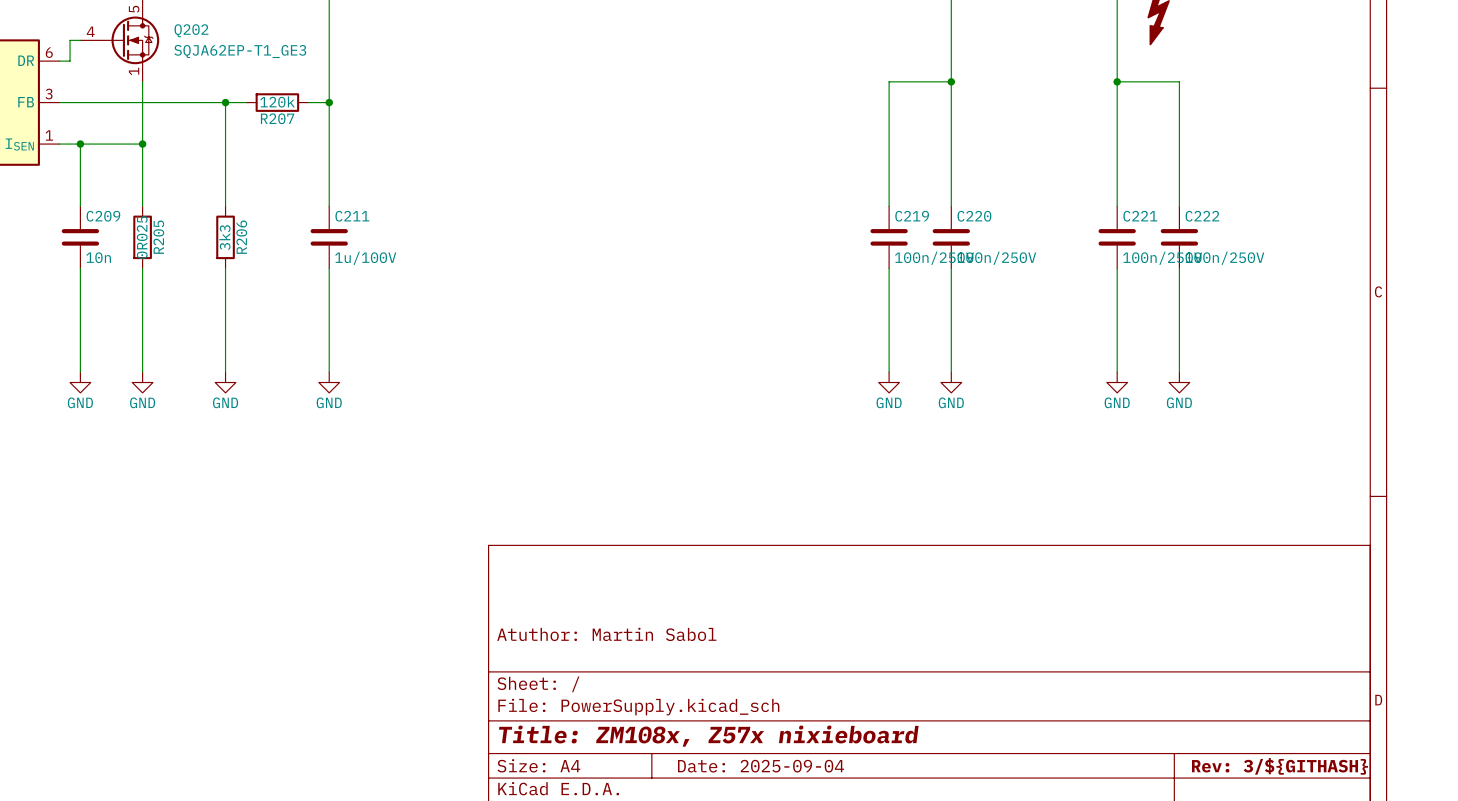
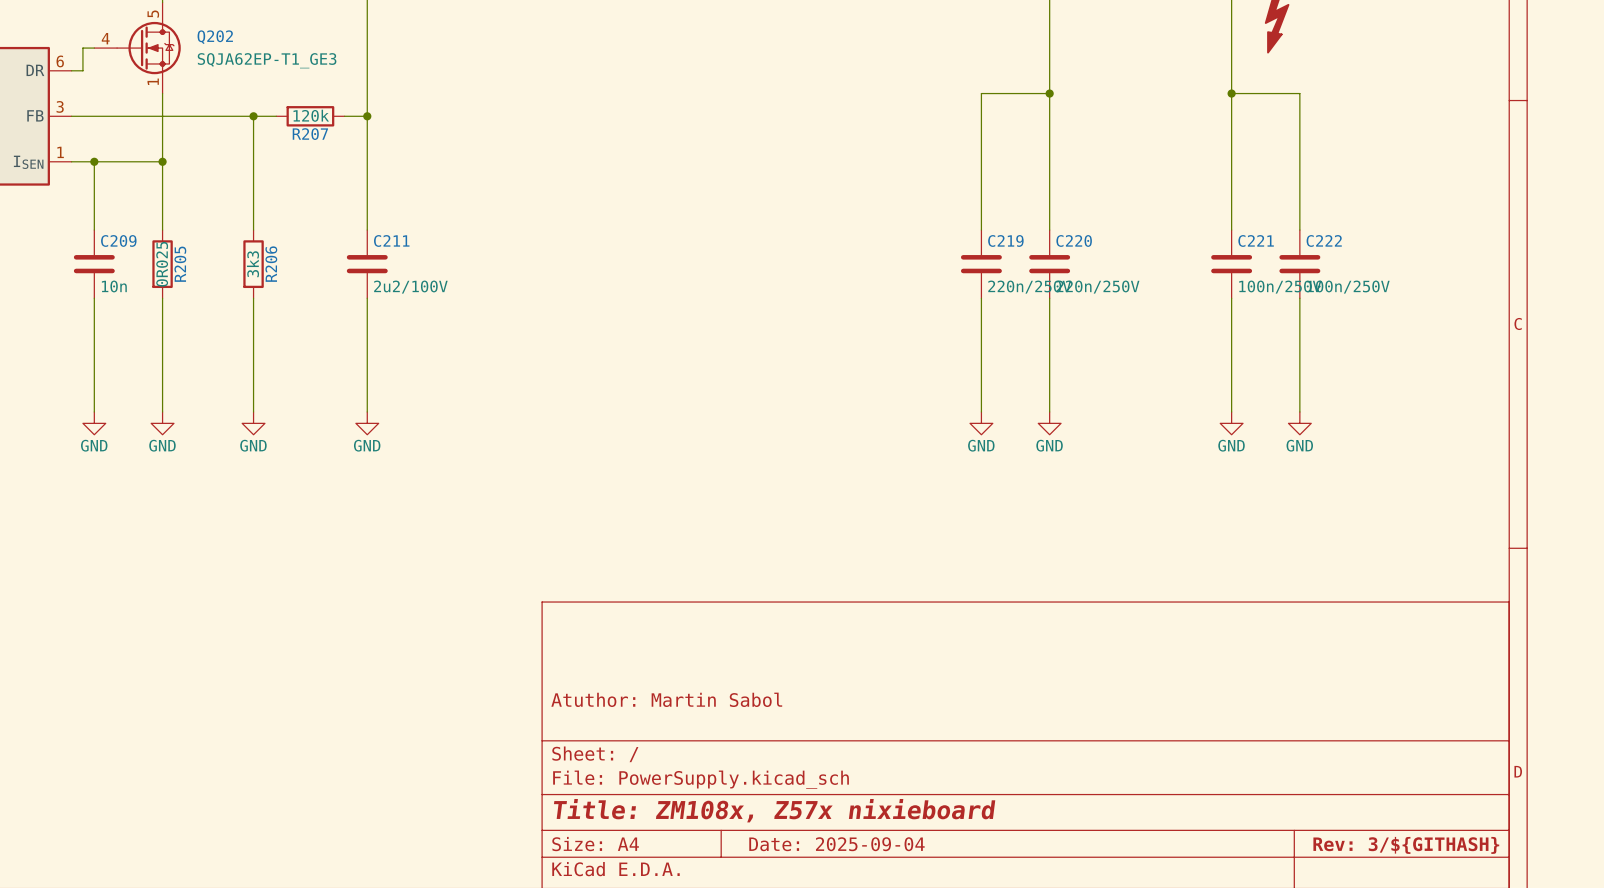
C211 value: 1u/100V (365, 258) -> 2u2/100V (410, 287)
C219 value: 100n/250V (934, 258) -> 220n/250V (1029, 287)
C220 value: 100n/250V (996, 258) -> 220n/250V (1097, 287)

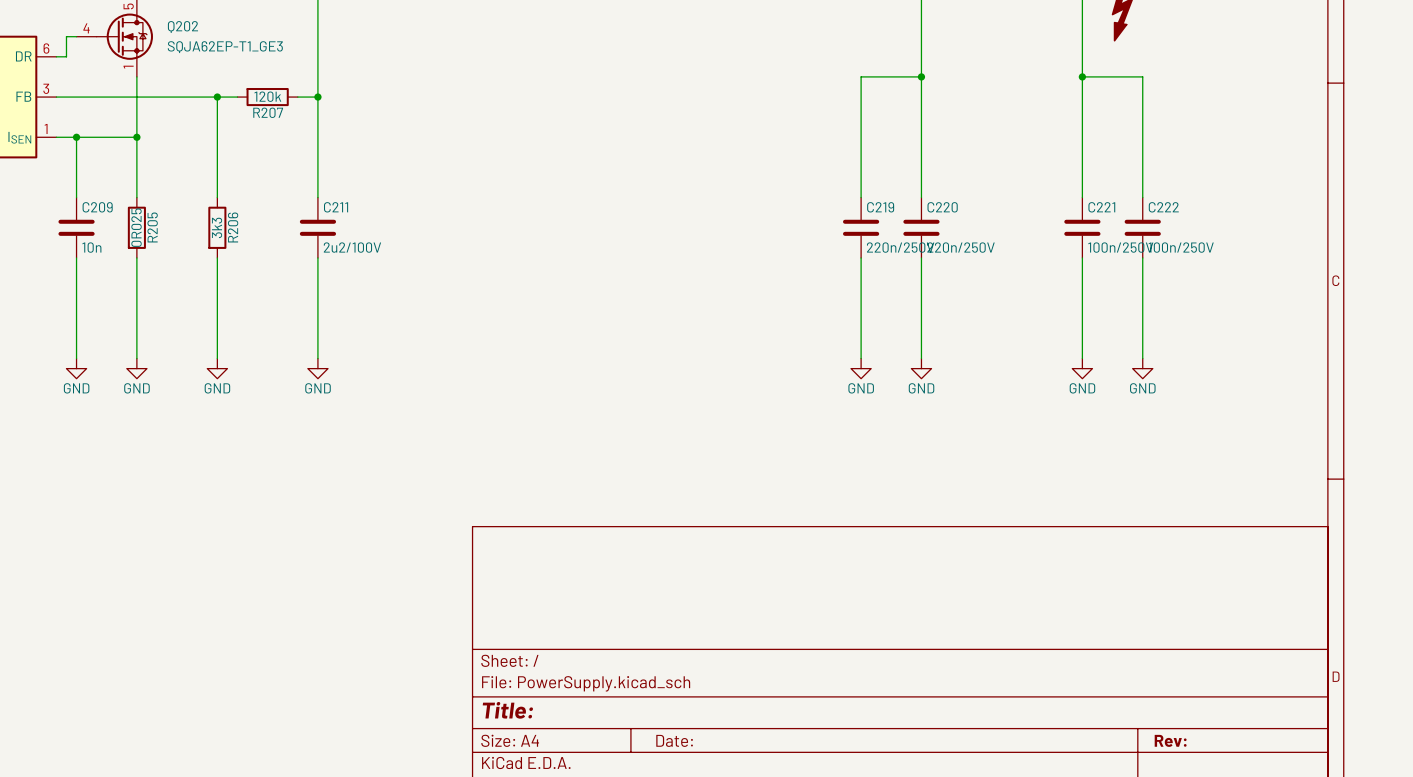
title block: Atuthor: Martin Sabol (666, 699) -> none
title block: Title: ZM108x, Z57x nixieboard (774, 810) -> Title: (507, 710)
title block: Date: 2025-09-04 (836, 844) -> Date: (674, 740)
title block: Rev: 3/${GITHASH} (1406, 845) -> Rev: (1170, 740)

